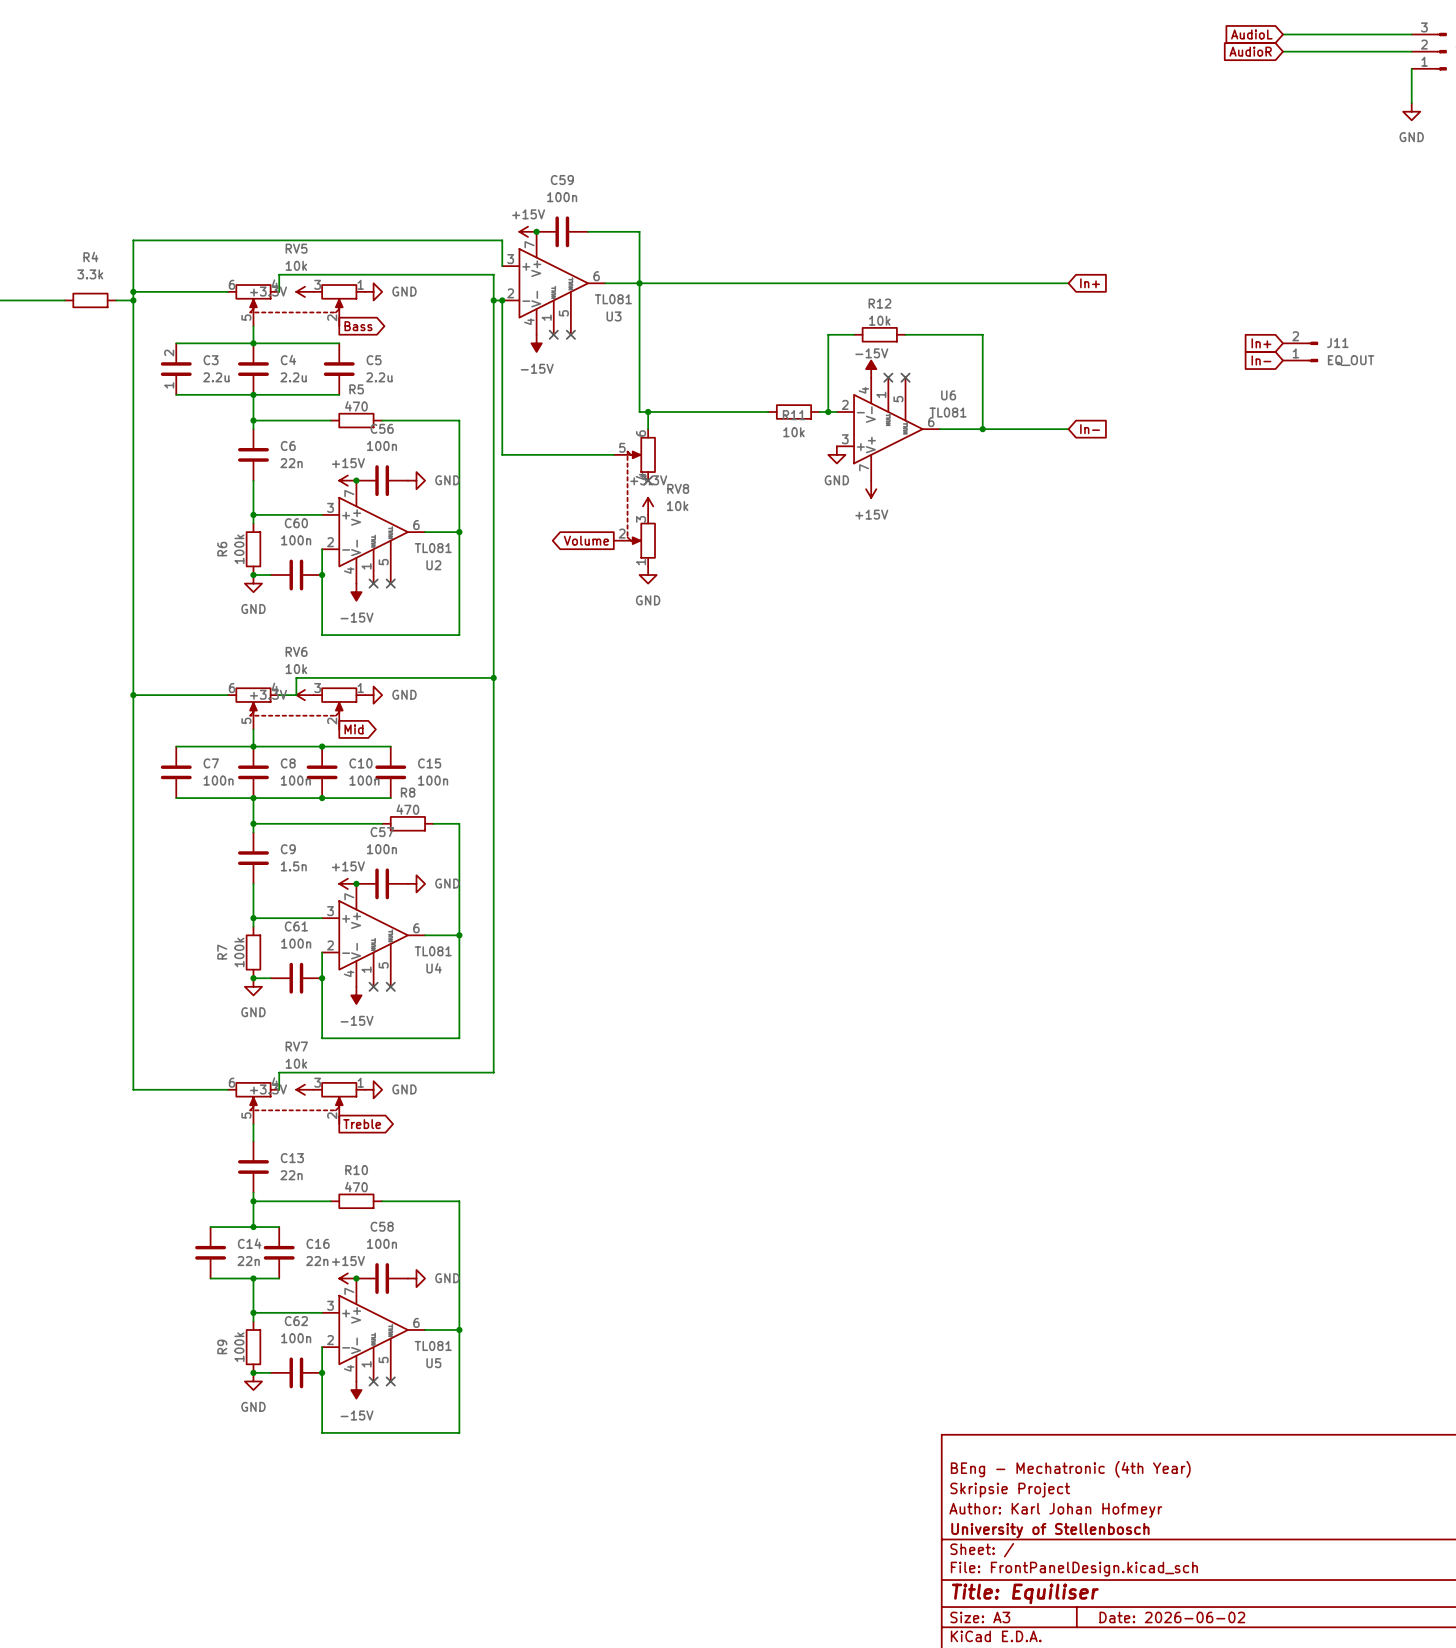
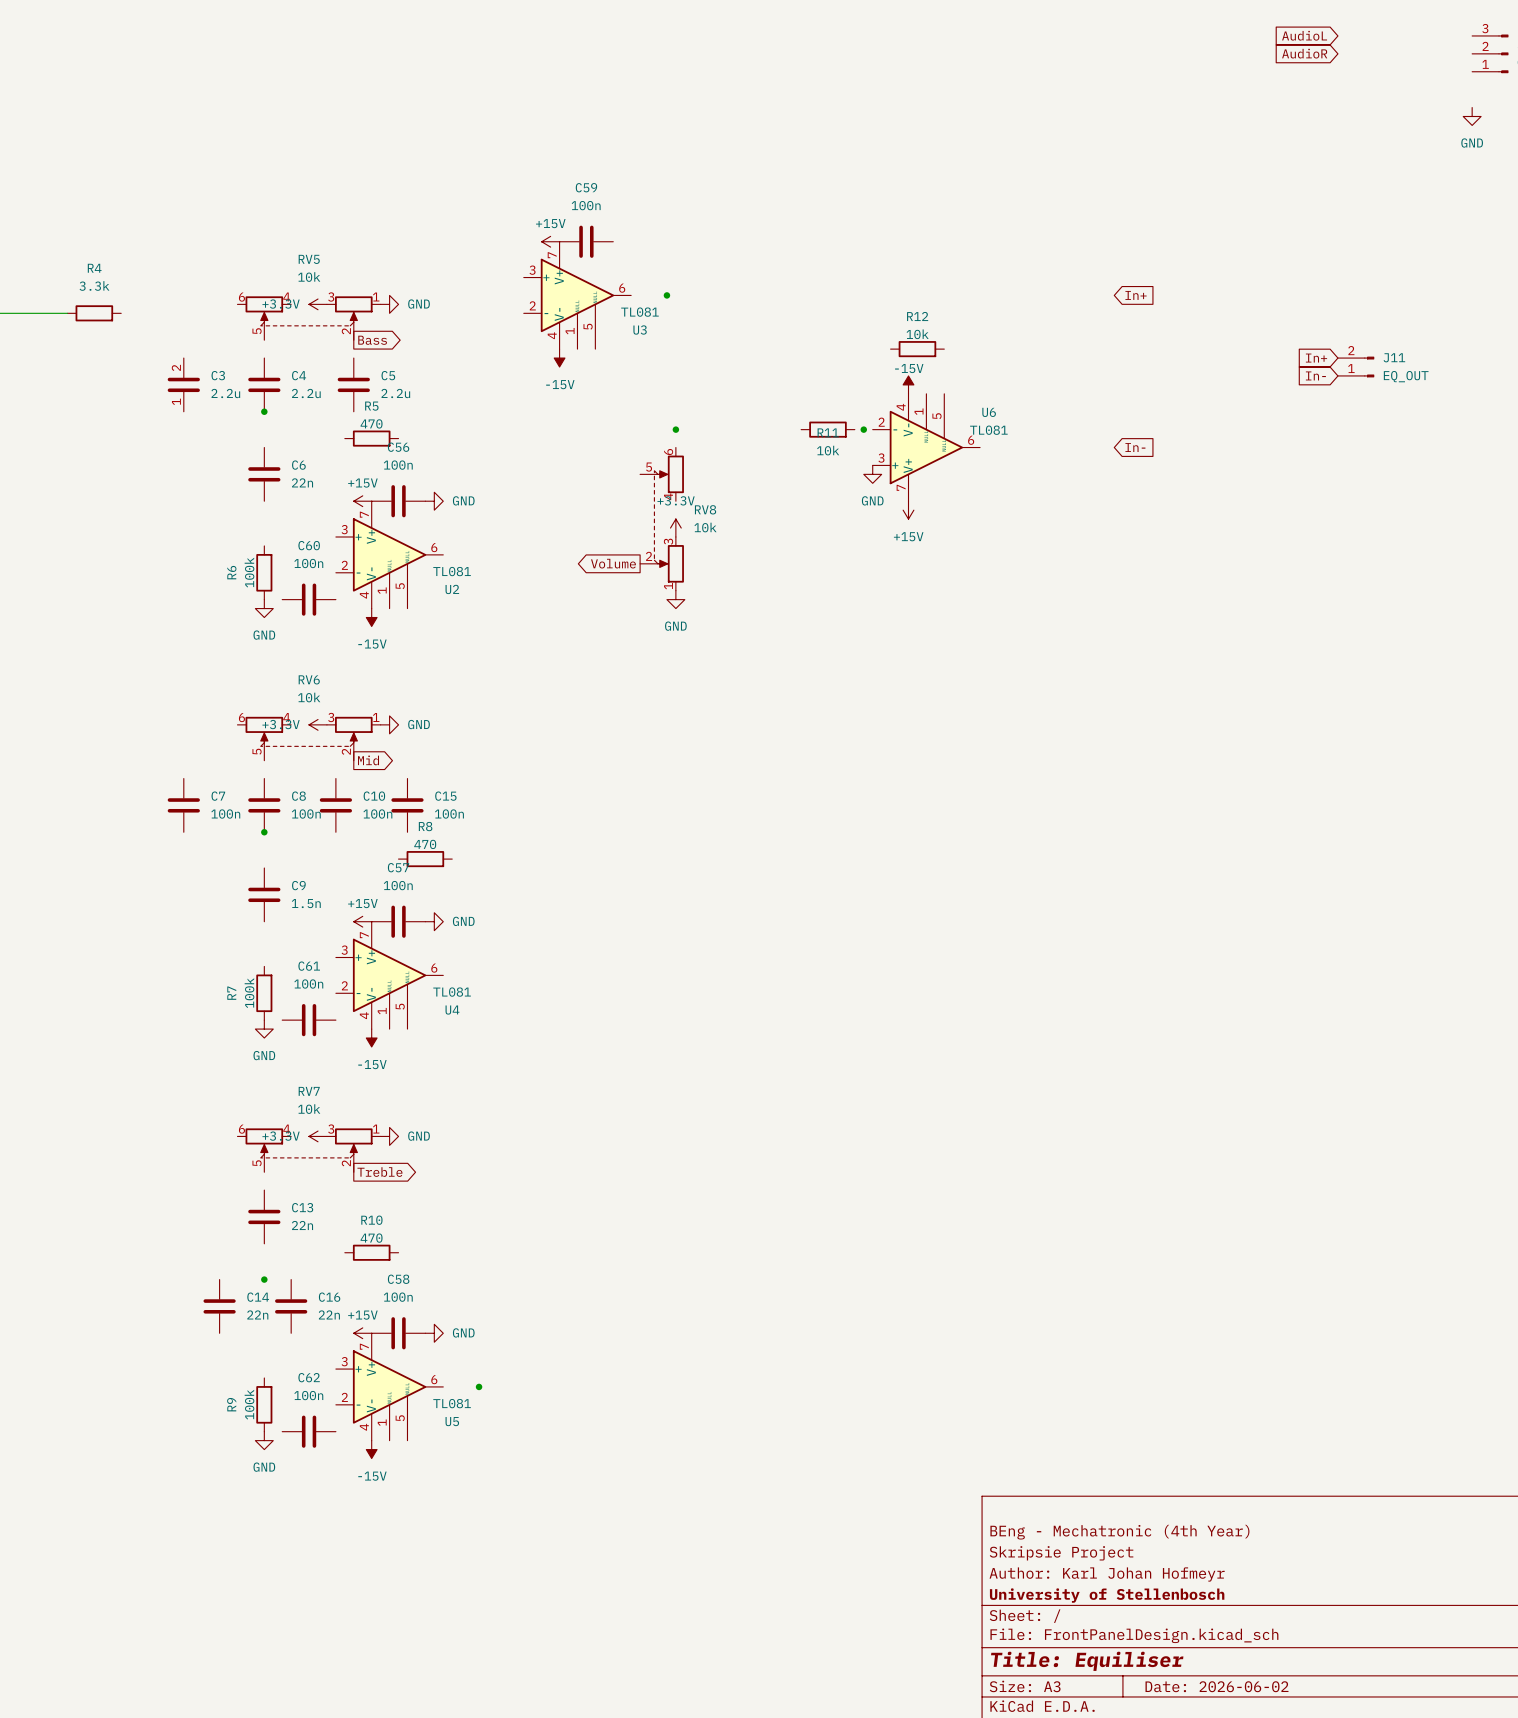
wire: (1283, 34) (1411, 34) -> none
wire: (1283, 51) (1411, 51) -> none
wire: (1411, 68) (1411, 103) -> none
junction: (536, 231) -> none
wire: (588, 231) (639, 231) (639, 411) (768, 411) -> none
wire: (502, 266) (502, 240) (133, 240) (133, 1089) (227, 1089) -> none
wire: (605, 283) (1068, 283) -> none
wire: (133, 291) (227, 291) -> none
junction: (133, 291) -> none
wire: (279, 291) (279, 274) (493, 274) (493, 1072) (279, 1072) (279, 1089) -> none
wire: (116, 300) (133, 300) -> none
junction: (133, 300) -> none
wire: (493, 300) (502, 300) (502, 454) (613, 454) -> none
junction: (493, 300) -> none
junction: (502, 300) -> none
wire: (253, 326) (253, 343) -> none
no-connect mark: (553, 334) -> none
no-connect mark: (570, 334) -> none
wire: (854, 334) (828, 334) (828, 411) -> none
wire: (905, 334) (982, 334) (982, 429) -> none
wire: (176, 343) (339, 343) -> none
junction: (253, 343) -> none
no-connect mark: (888, 377) -> none
no-connect mark: (905, 377) -> none
wire: (176, 394) (339, 394) -> none
wire: (253, 394) (253, 429) -> none
wire: (648, 411) (648, 429) -> none
wire: (819, 411) (836, 411) -> none
wire: (253, 420) (330, 420) -> none
junction: (253, 420) -> none
wire: (382, 420) (459, 420) (459, 635) (322, 635) (322, 549) -> none
wire: (939, 429) (1068, 429) -> none
junction: (982, 429) -> none
wire: (253, 480) (253, 523) -> none
junction: (356, 480) -> none
no-connect mark: (648, 480) -> none
wire: (253, 514) (322, 514) -> none
junction: (253, 514) -> none
wire: (425, 532) (459, 532) -> none
junction: (459, 532) -> none
wire: (253, 575) (270, 575) -> none
junction: (253, 575) -> none
junction: (322, 575) -> none
no-connect mark: (373, 583) -> none
no-connect mark: (390, 583) -> none
wire: (493, 677) (296, 677) (296, 695) (279, 695) -> none
junction: (493, 677) -> none
wire: (133, 695) (227, 695) -> none
junction: (133, 695) -> none
wire: (253, 729) (253, 746) -> none
wire: (176, 746) (390, 746) -> none
junction: (253, 746) -> none
junction: (322, 746) -> none
wire: (176, 798) (390, 798) -> none
wire: (253, 798) (253, 832) -> none
junction: (322, 798) -> none
wire: (253, 823) (382, 823) -> none
junction: (253, 823) -> none
wire: (433, 823) (459, 823) (459, 1038) (322, 1038) (322, 952) -> none
wire: (253, 883) (253, 926) -> none
junction: (356, 883) -> none
wire: (253, 918) (322, 918) -> none
junction: (253, 918) -> none
wire: (425, 935) (459, 935) -> none
junction: (459, 935) -> none
wire: (253, 978) (270, 978) -> none
junction: (253, 978) -> none
junction: (322, 978) -> none
no-connect mark: (373, 986) -> none
no-connect mark: (390, 986) -> none
wire: (253, 1124) (253, 1141) -> none
wire: (253, 1192) (253, 1227) -> none
wire: (253, 1201) (330, 1201) -> none
junction: (253, 1201) -> none
wire: (382, 1201) (459, 1201) (459, 1432) (322, 1432) (322, 1347) -> none
wire: (210, 1227) (279, 1227) -> none
wire: (210, 1278) (279, 1278) -> none
wire: (253, 1278) (253, 1321) -> none
junction: (253, 1278) -> none
junction: (356, 1278) -> none
wire: (253, 1312) (322, 1312) -> none
junction: (253, 1312) -> none
wire: (425, 1329) (459, 1329) -> none
wire: (253, 1372) (270, 1372) -> none
junction: (253, 1372) -> none
junction: (322, 1372) -> none
no-connect mark: (373, 1381) -> none
no-connect mark: (390, 1381) -> none

